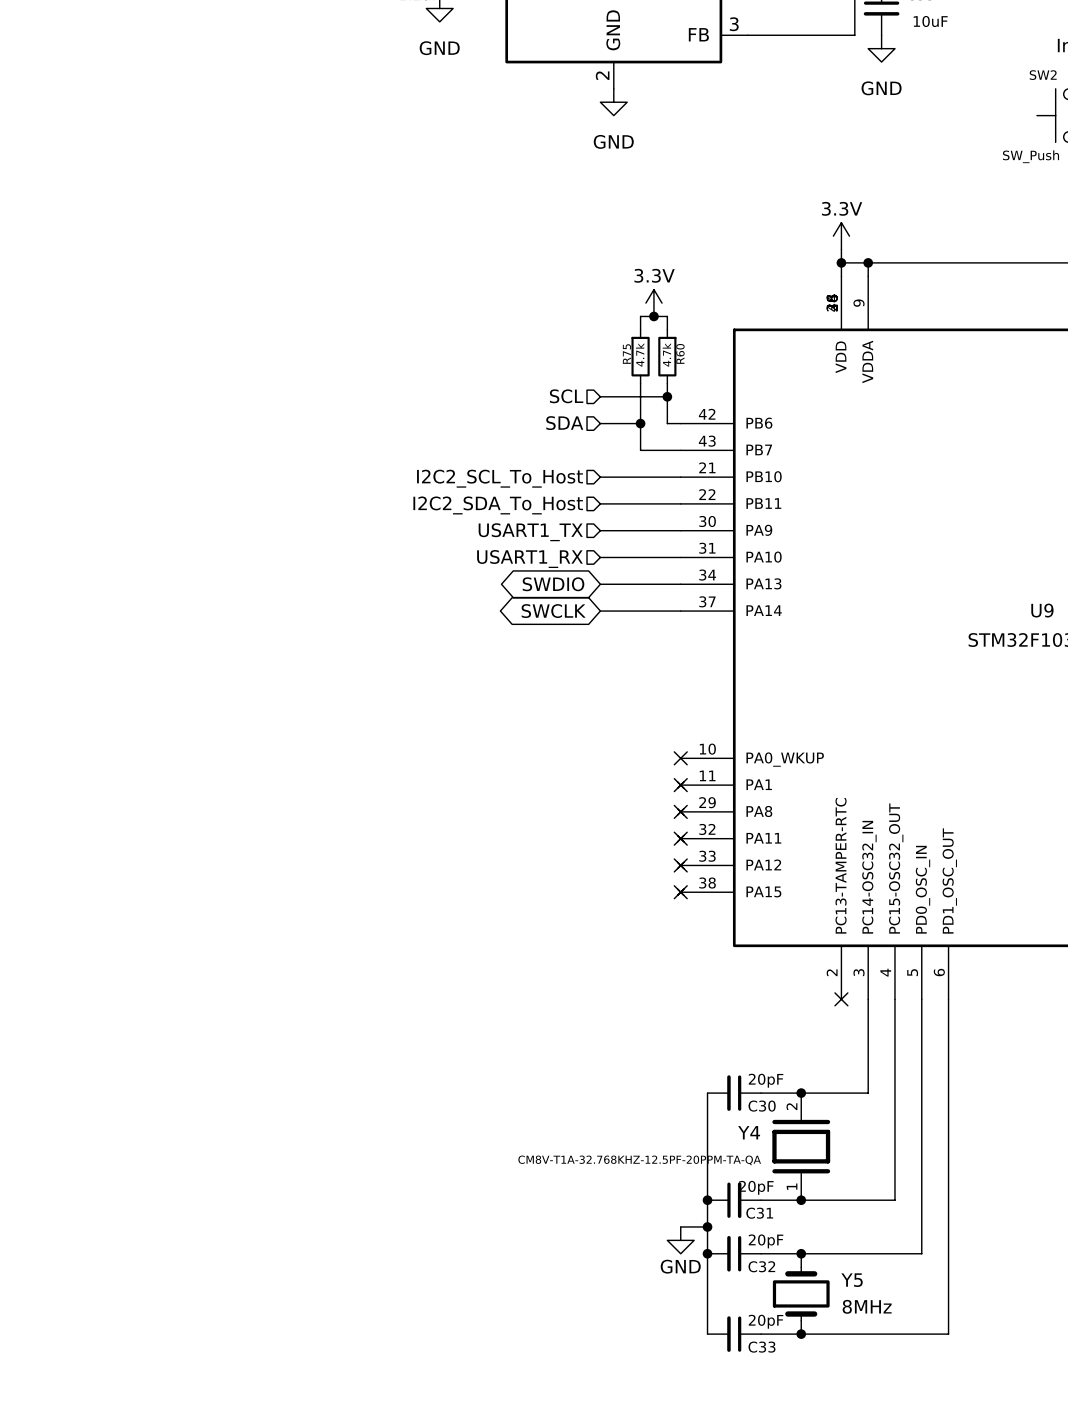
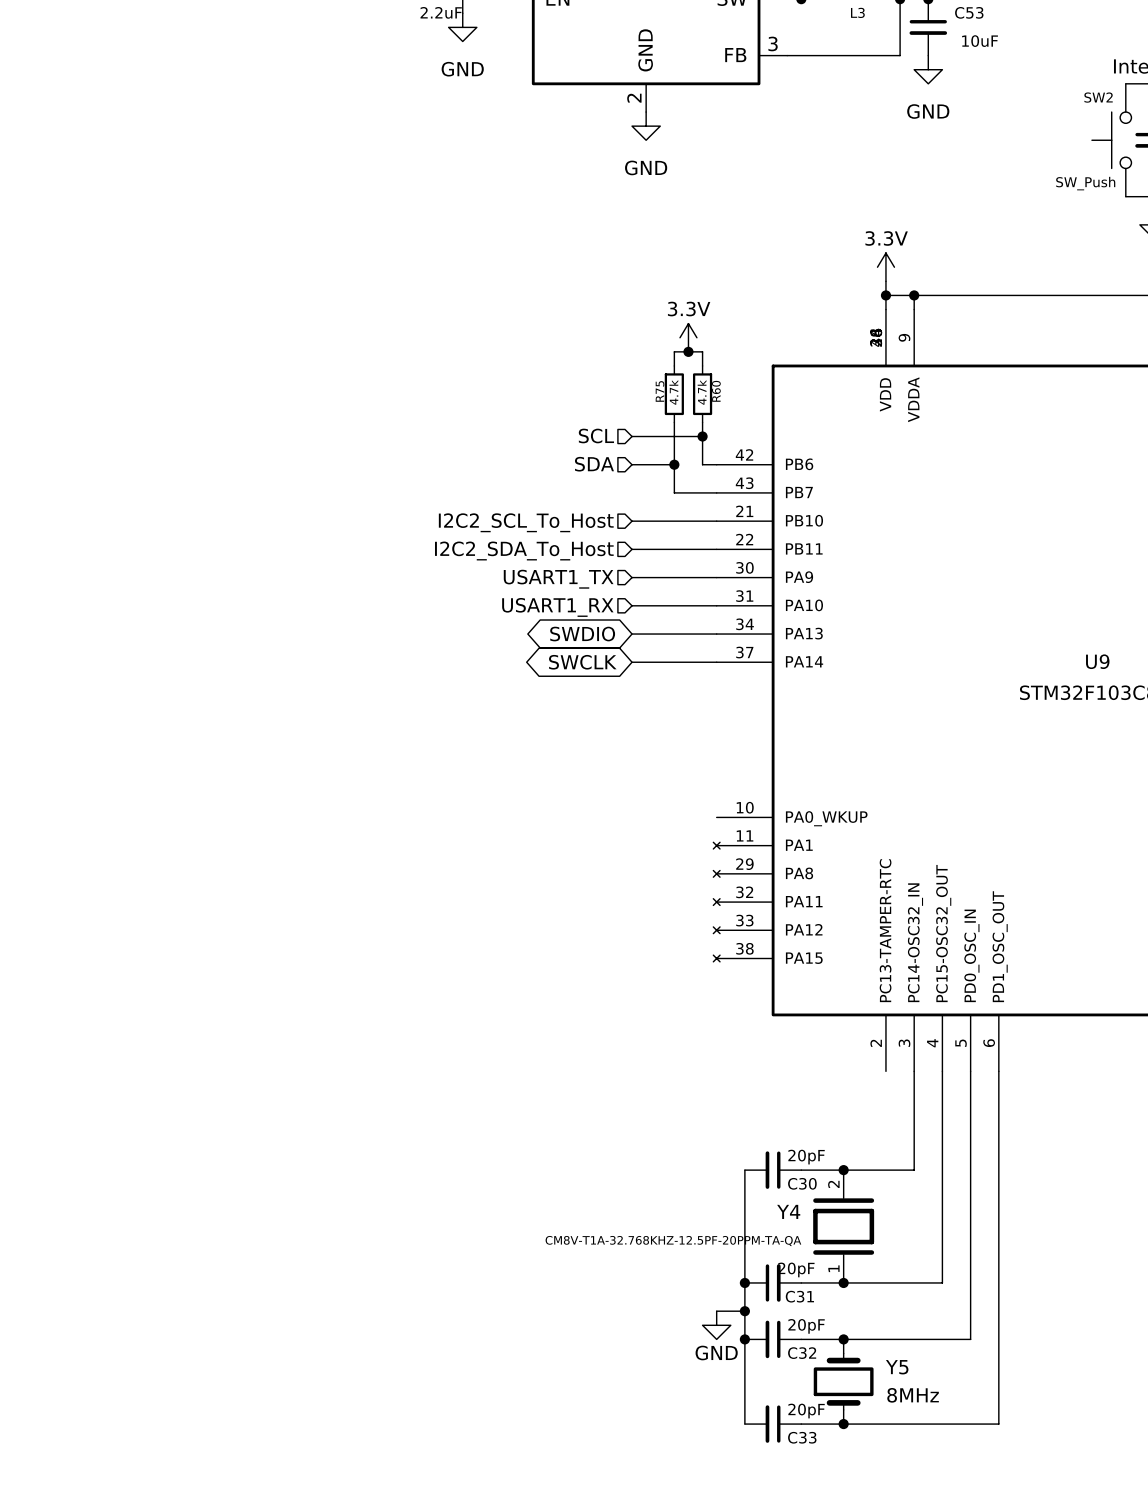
no-connect mark: (680, 758) -> none
no-connect mark: (680, 785) -> none
no-connect mark: (680, 811) -> none
no-connect mark: (680, 838) -> none
no-connect mark: (680, 865) -> none
no-connect mark: (680, 892) -> none
no-connect mark: (841, 999) -> none

